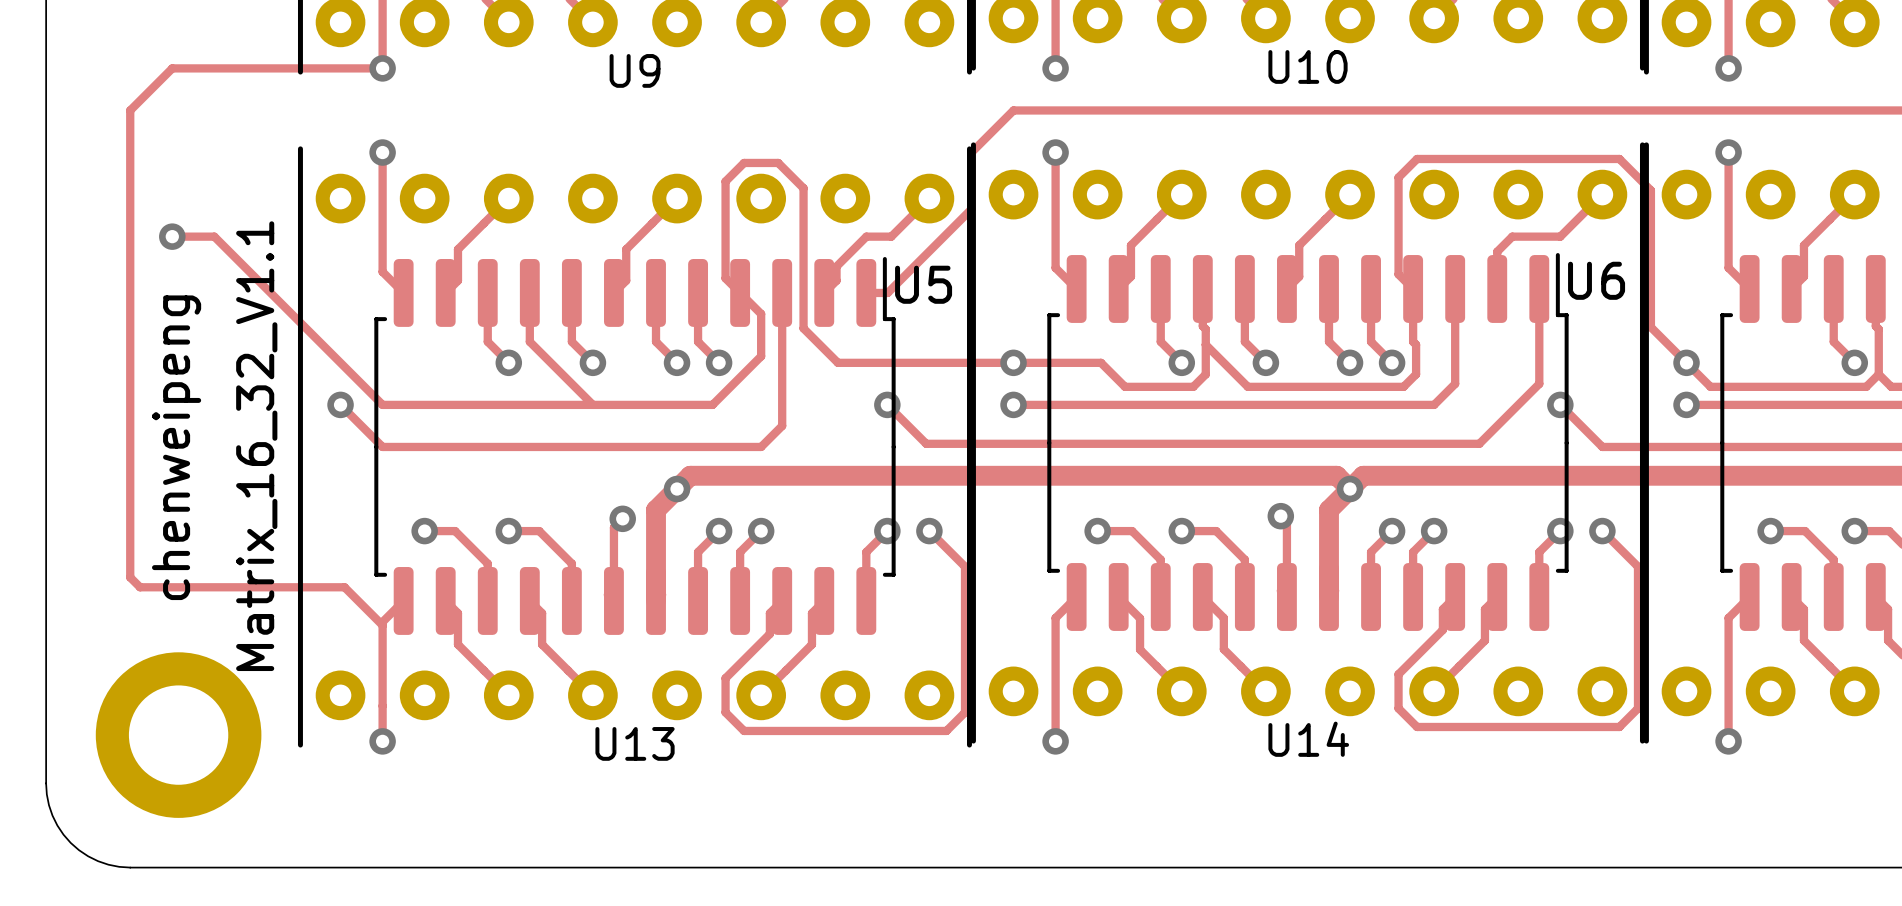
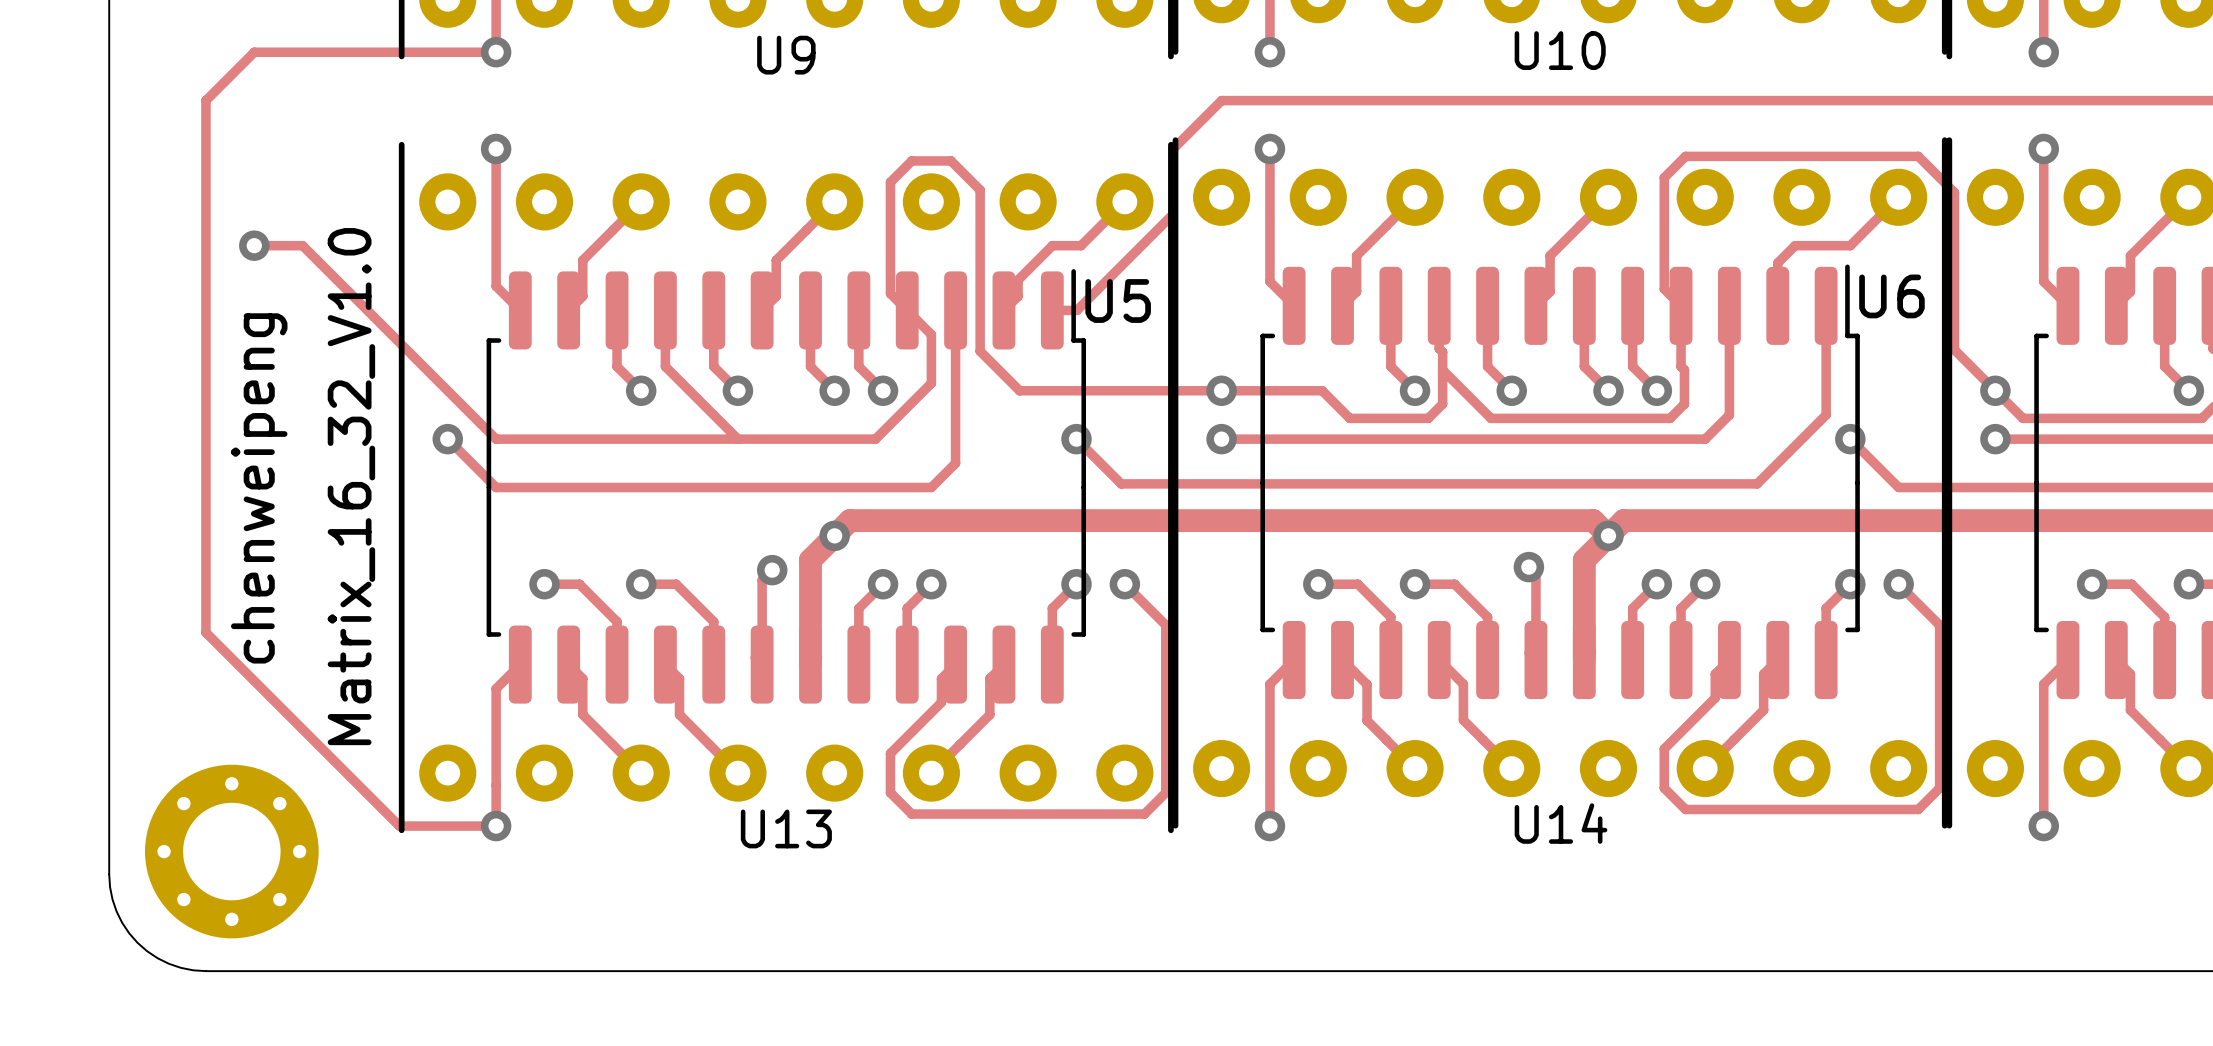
text: Matrix_16_32_V1.1 (256, 446) -> Matrix_16_32_V1.0 (351, 486)
track: (130, 573) (130, 577) (140, 587) (344, 587) (382, 625) -> (205, 632) (399, 826) (496, 826)
part: (178, 735) -> none
part: none -> (231, 851)

